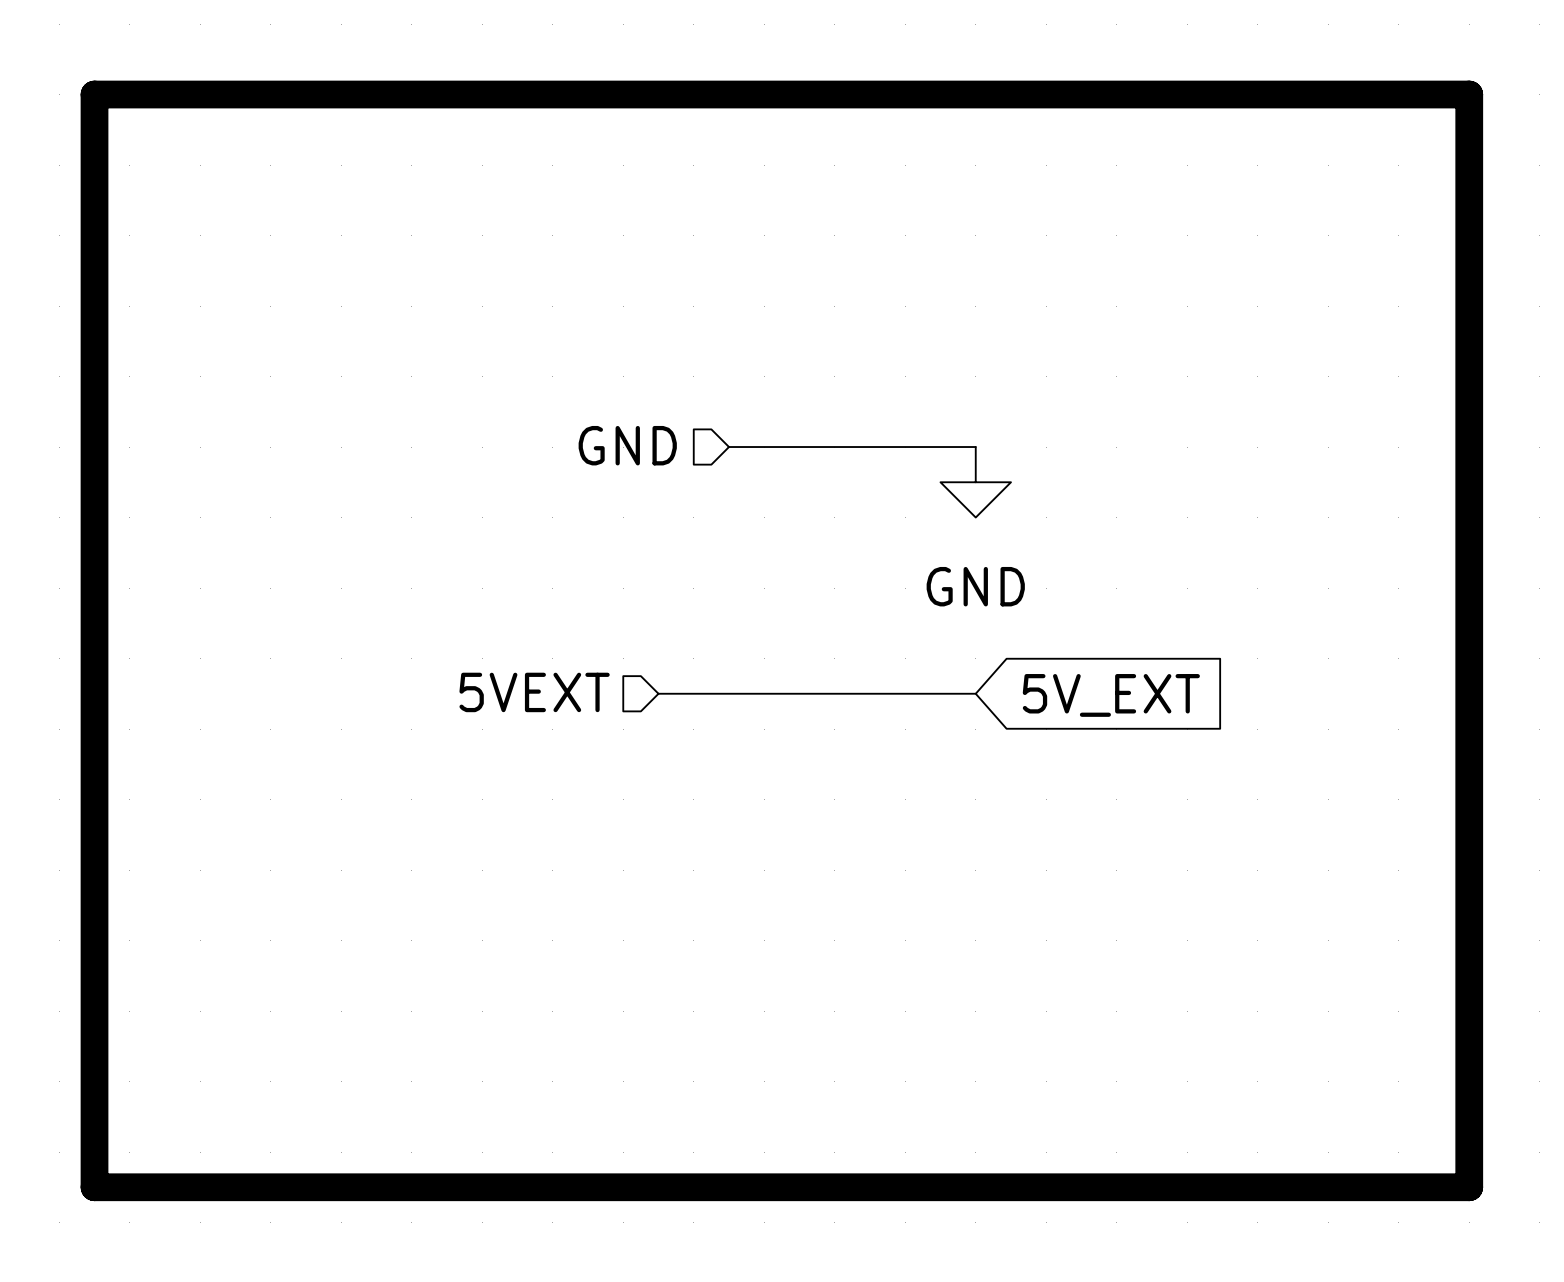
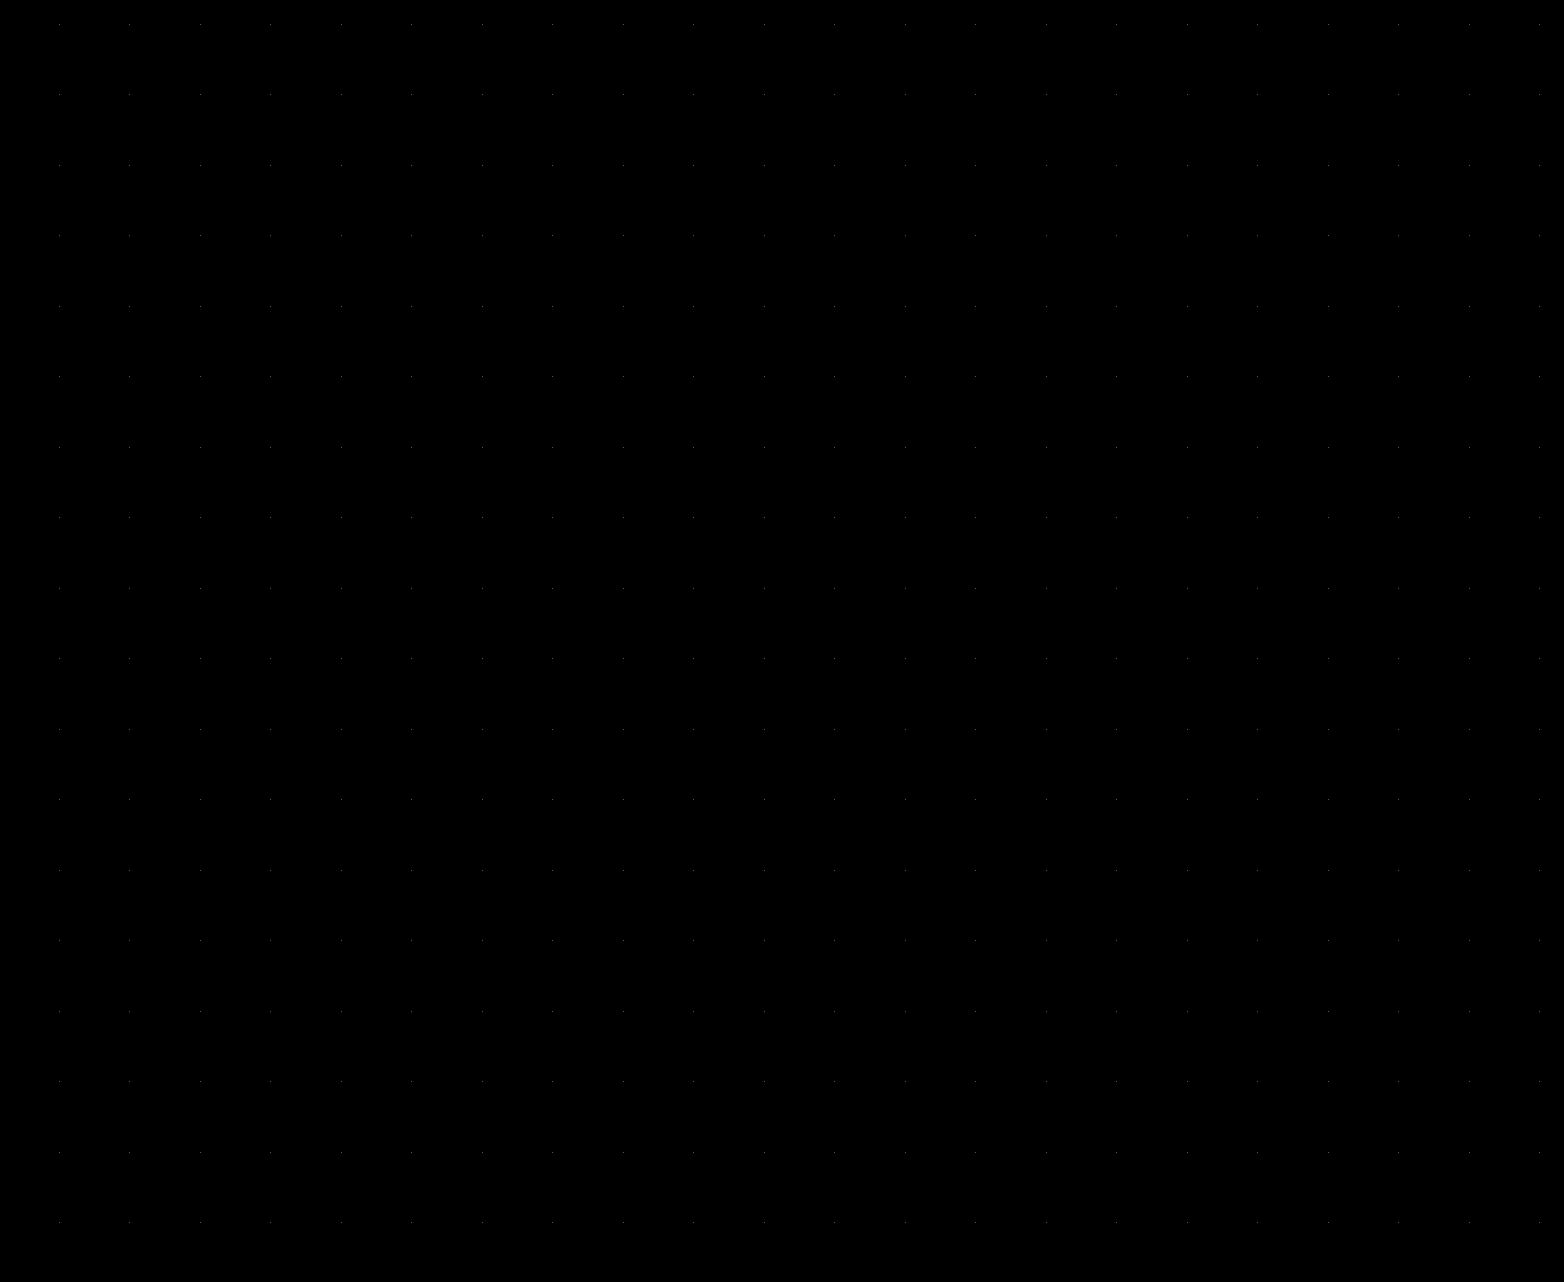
line: (94, 94) (1469, 94) (1469, 1187) (94, 1187) (94, 94) -> none
hierarchical label: GND (627, 445) -> none
wire: (729, 447) (975, 447) -> none
power symbol: GND (975, 482) -> none
hierarchical label: 5VEXT (534, 692) -> none
wire: (658, 693) (975, 693) -> none
global label: 5V_EXT (1111, 695) -> none

